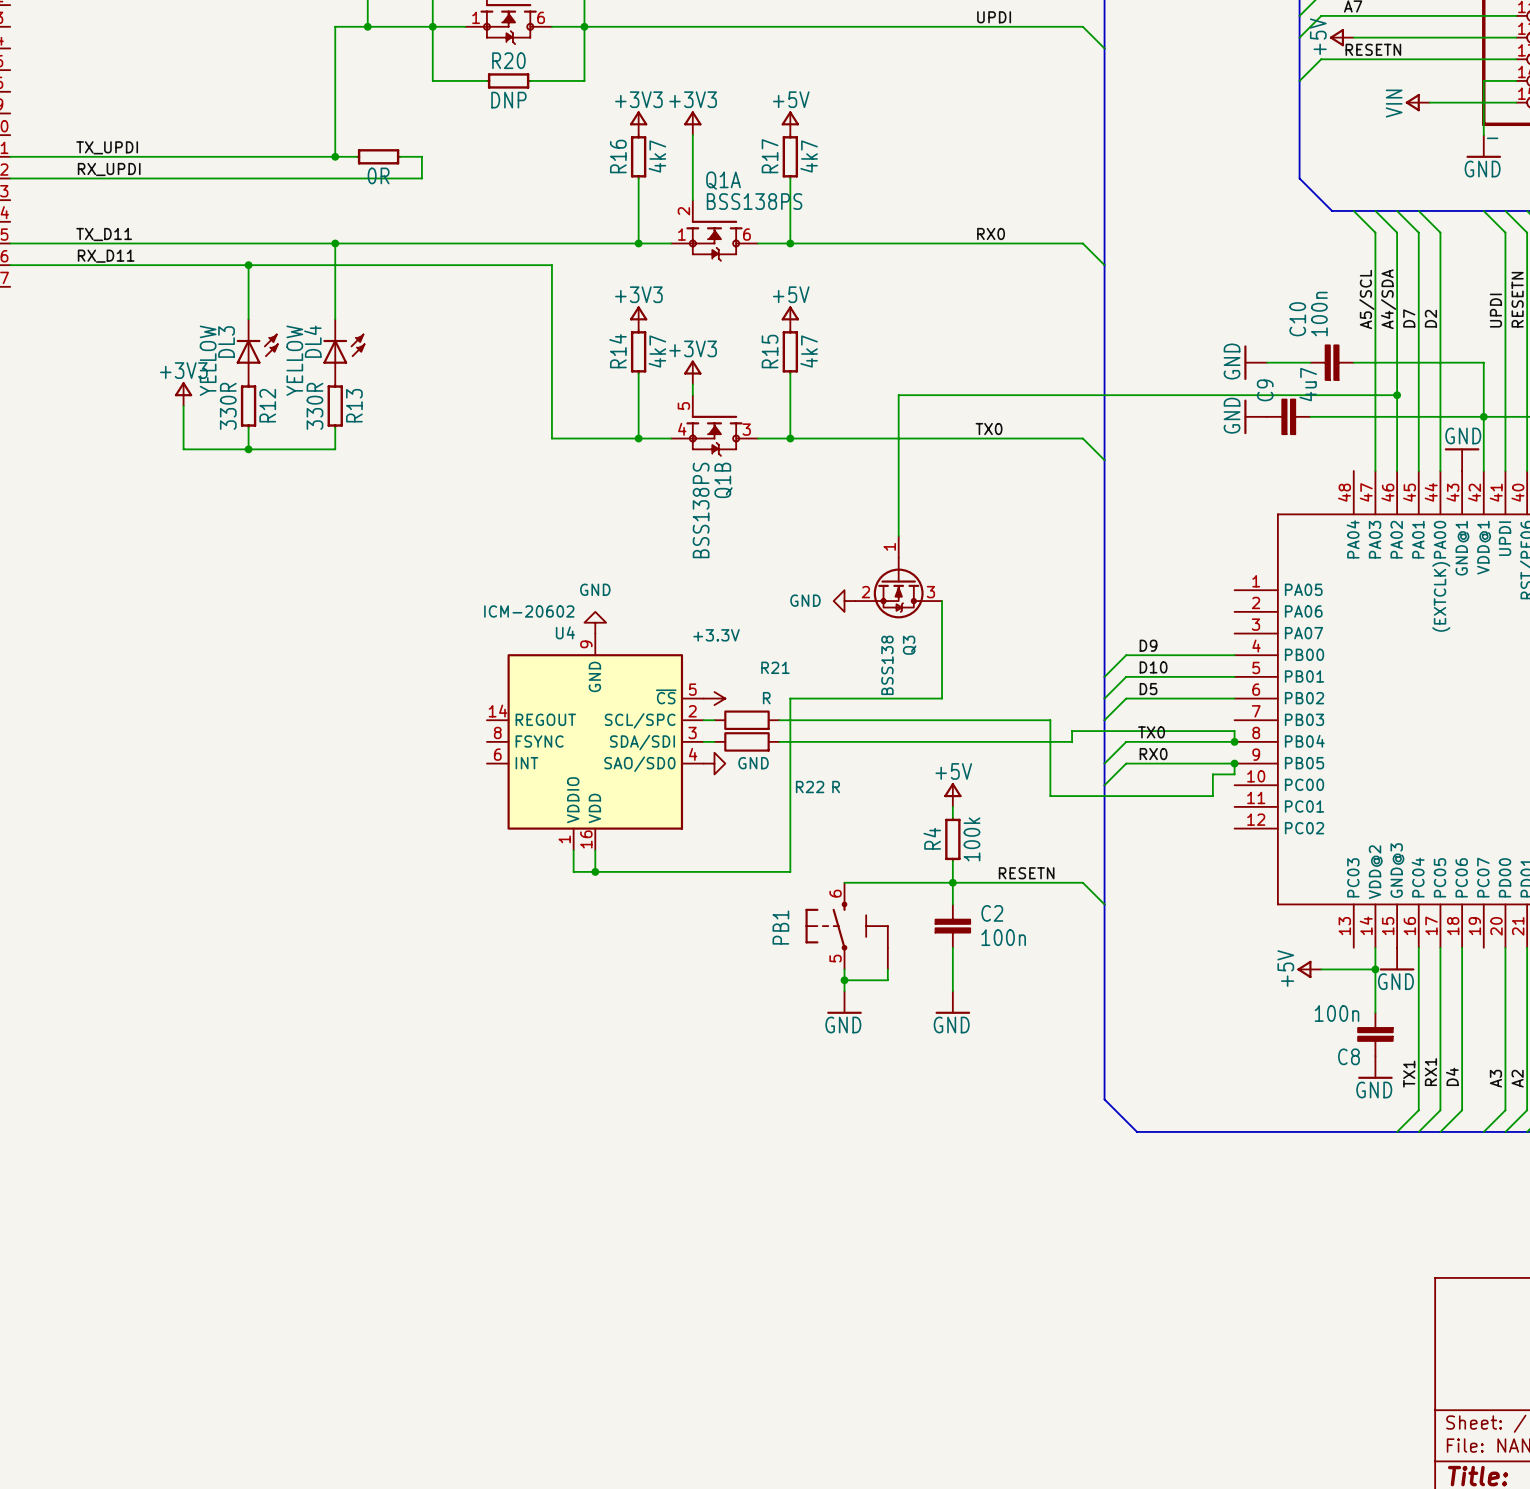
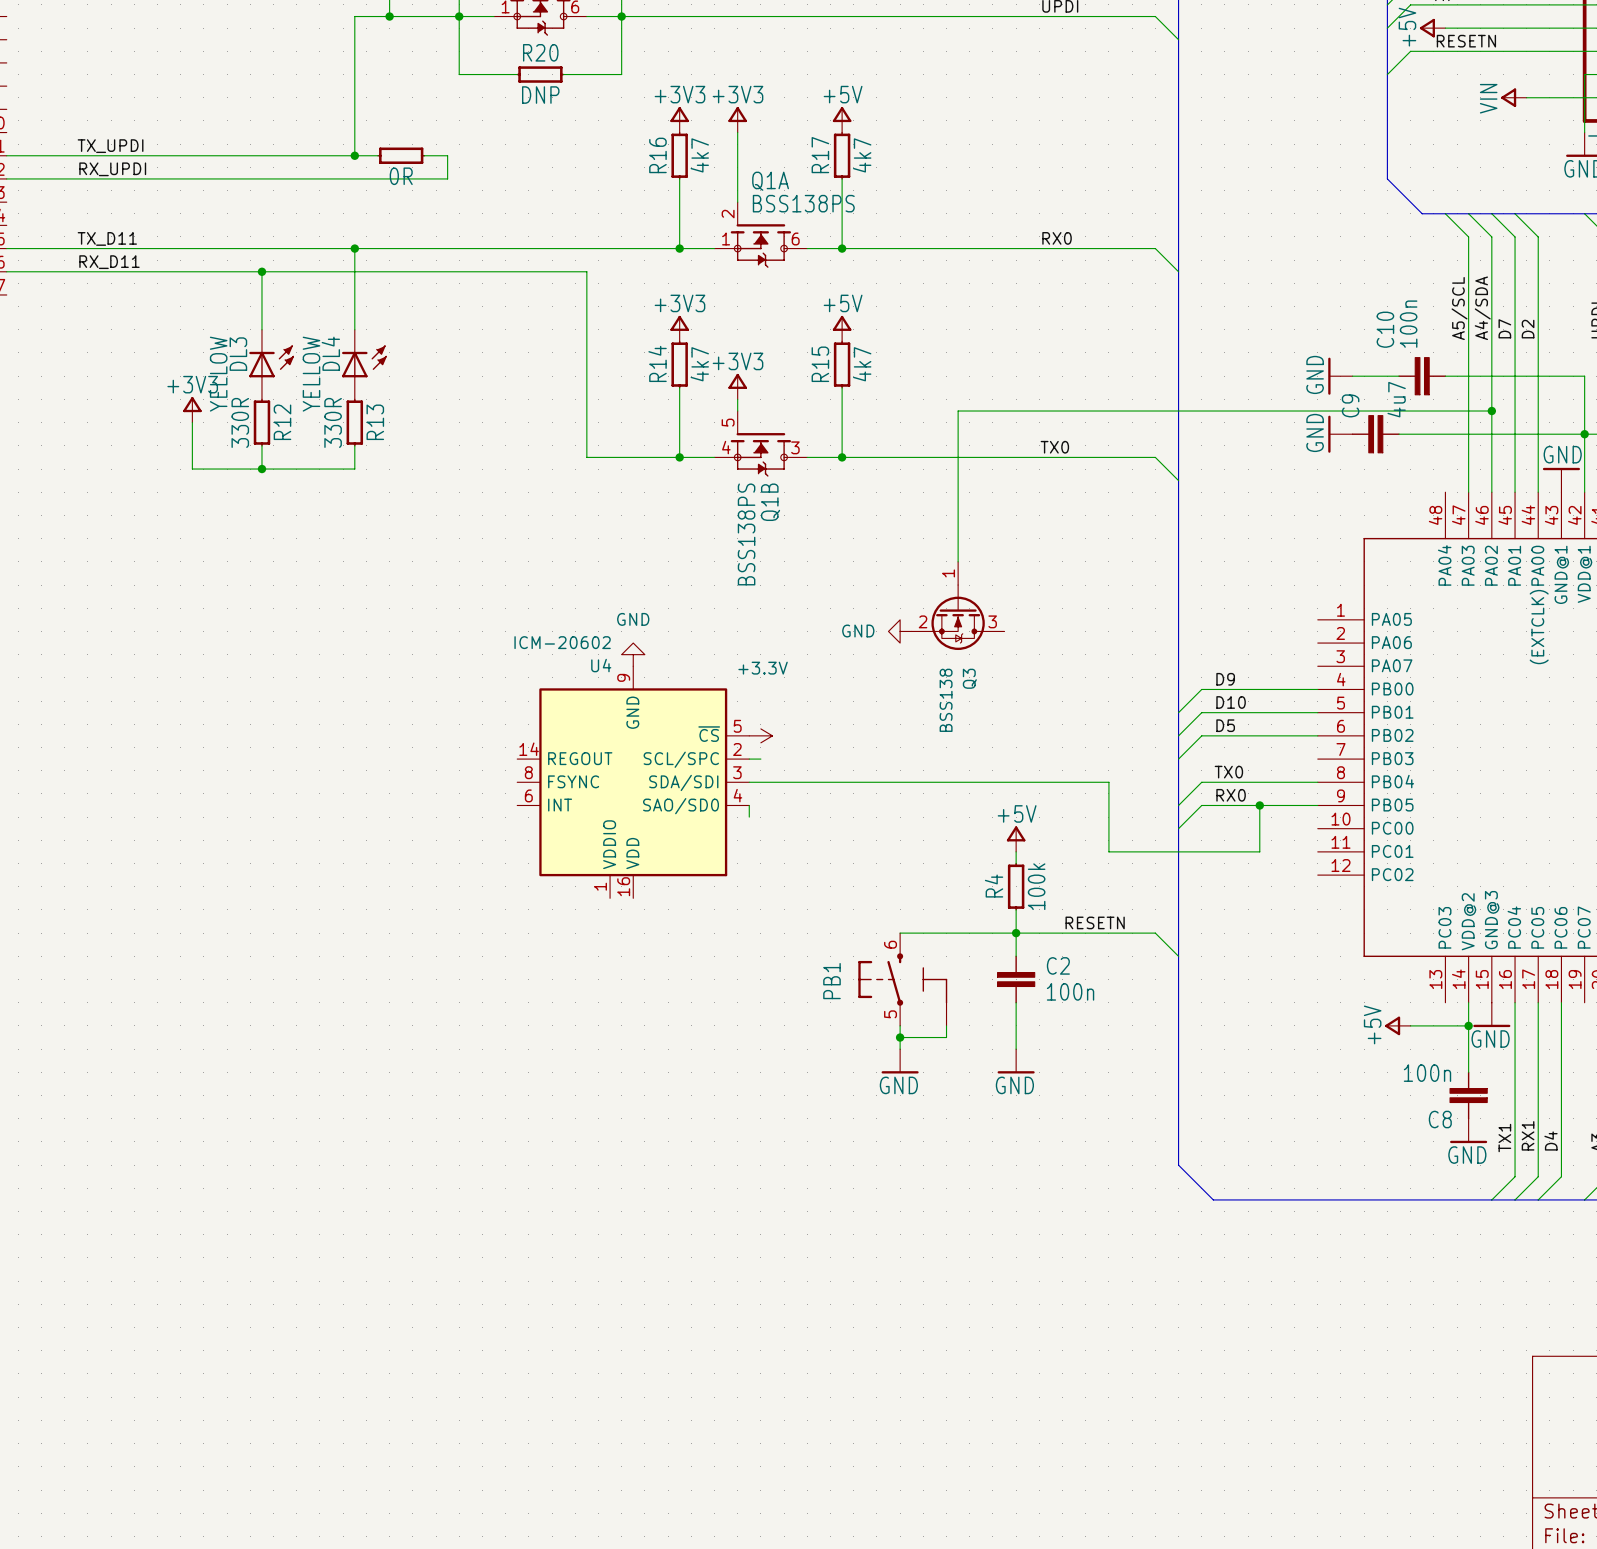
wire: (942, 601) (942, 698) (790, 698) (790, 871) (573, 871) (573, 850) -> none
R21: R (746, 720) -> none
wire: (779, 720) (1050, 720) (1050, 796) (1212, 796) (1212, 774) (1234, 774) (1234, 763) -> none
wire: none -> (760, 782) (830, 782)
R22: R (746, 741) -> none
wire: (1039, 741) (1072, 741) (1072, 731) (1234, 731) (1234, 741) -> (1108, 782) (1108, 851) (1259, 851) (1259, 805)
junction: (1234, 741) -> none
wire: none -> (749, 805) (749, 817)
power symbol: GND (714, 763) -> none
junction: none -> (1259, 805)
junction: (1234, 763) -> none
wire: (595, 850) (595, 871) -> none
junction: (595, 871) -> none

